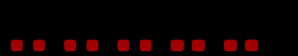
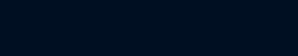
part: (28, 45) -> none
part: (81, 45) -> none
part: (134, 45) -> none
part: (187, 45) -> none
part: (241, 45) -> none

